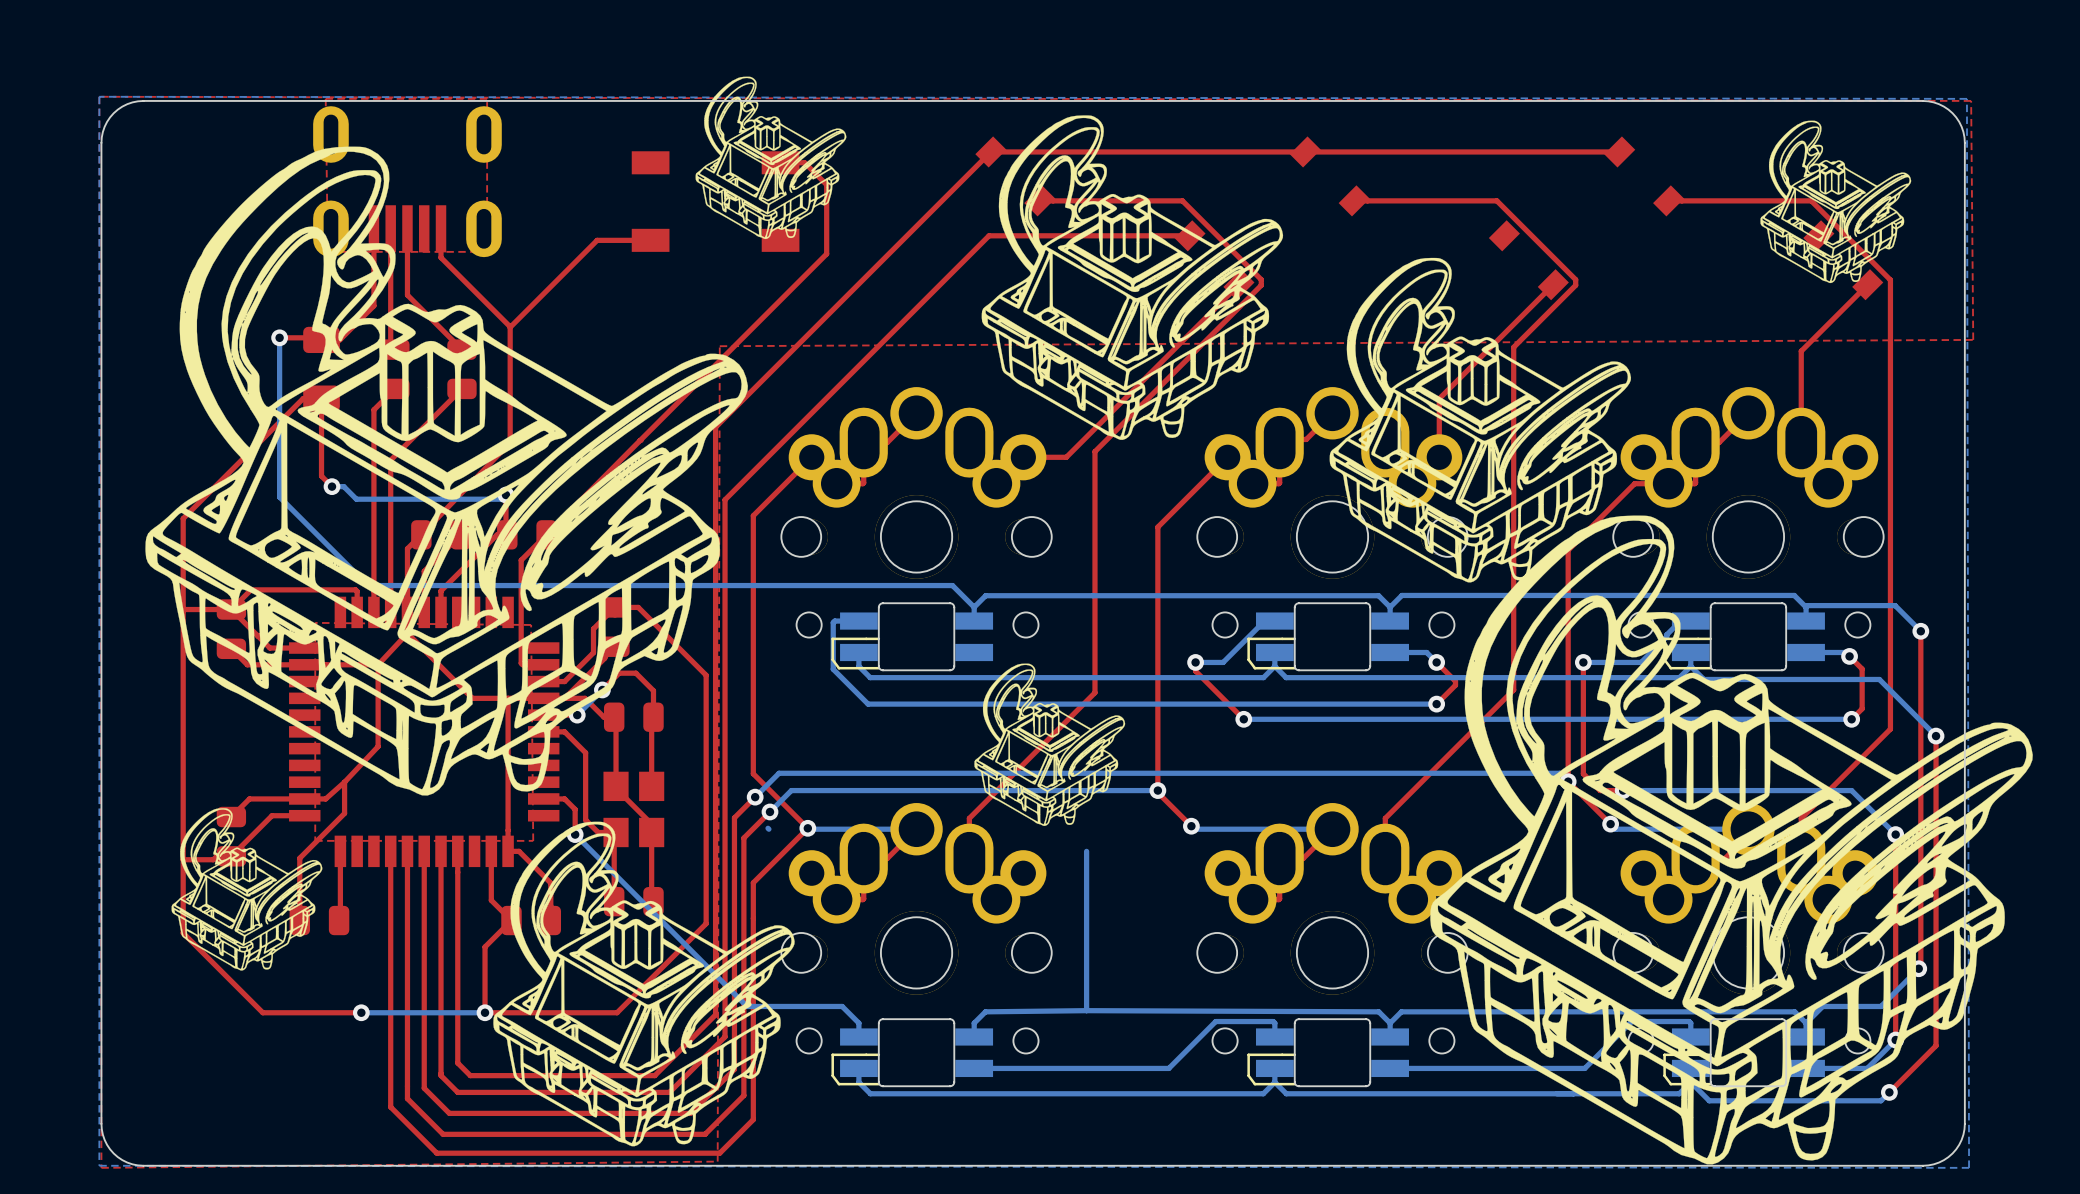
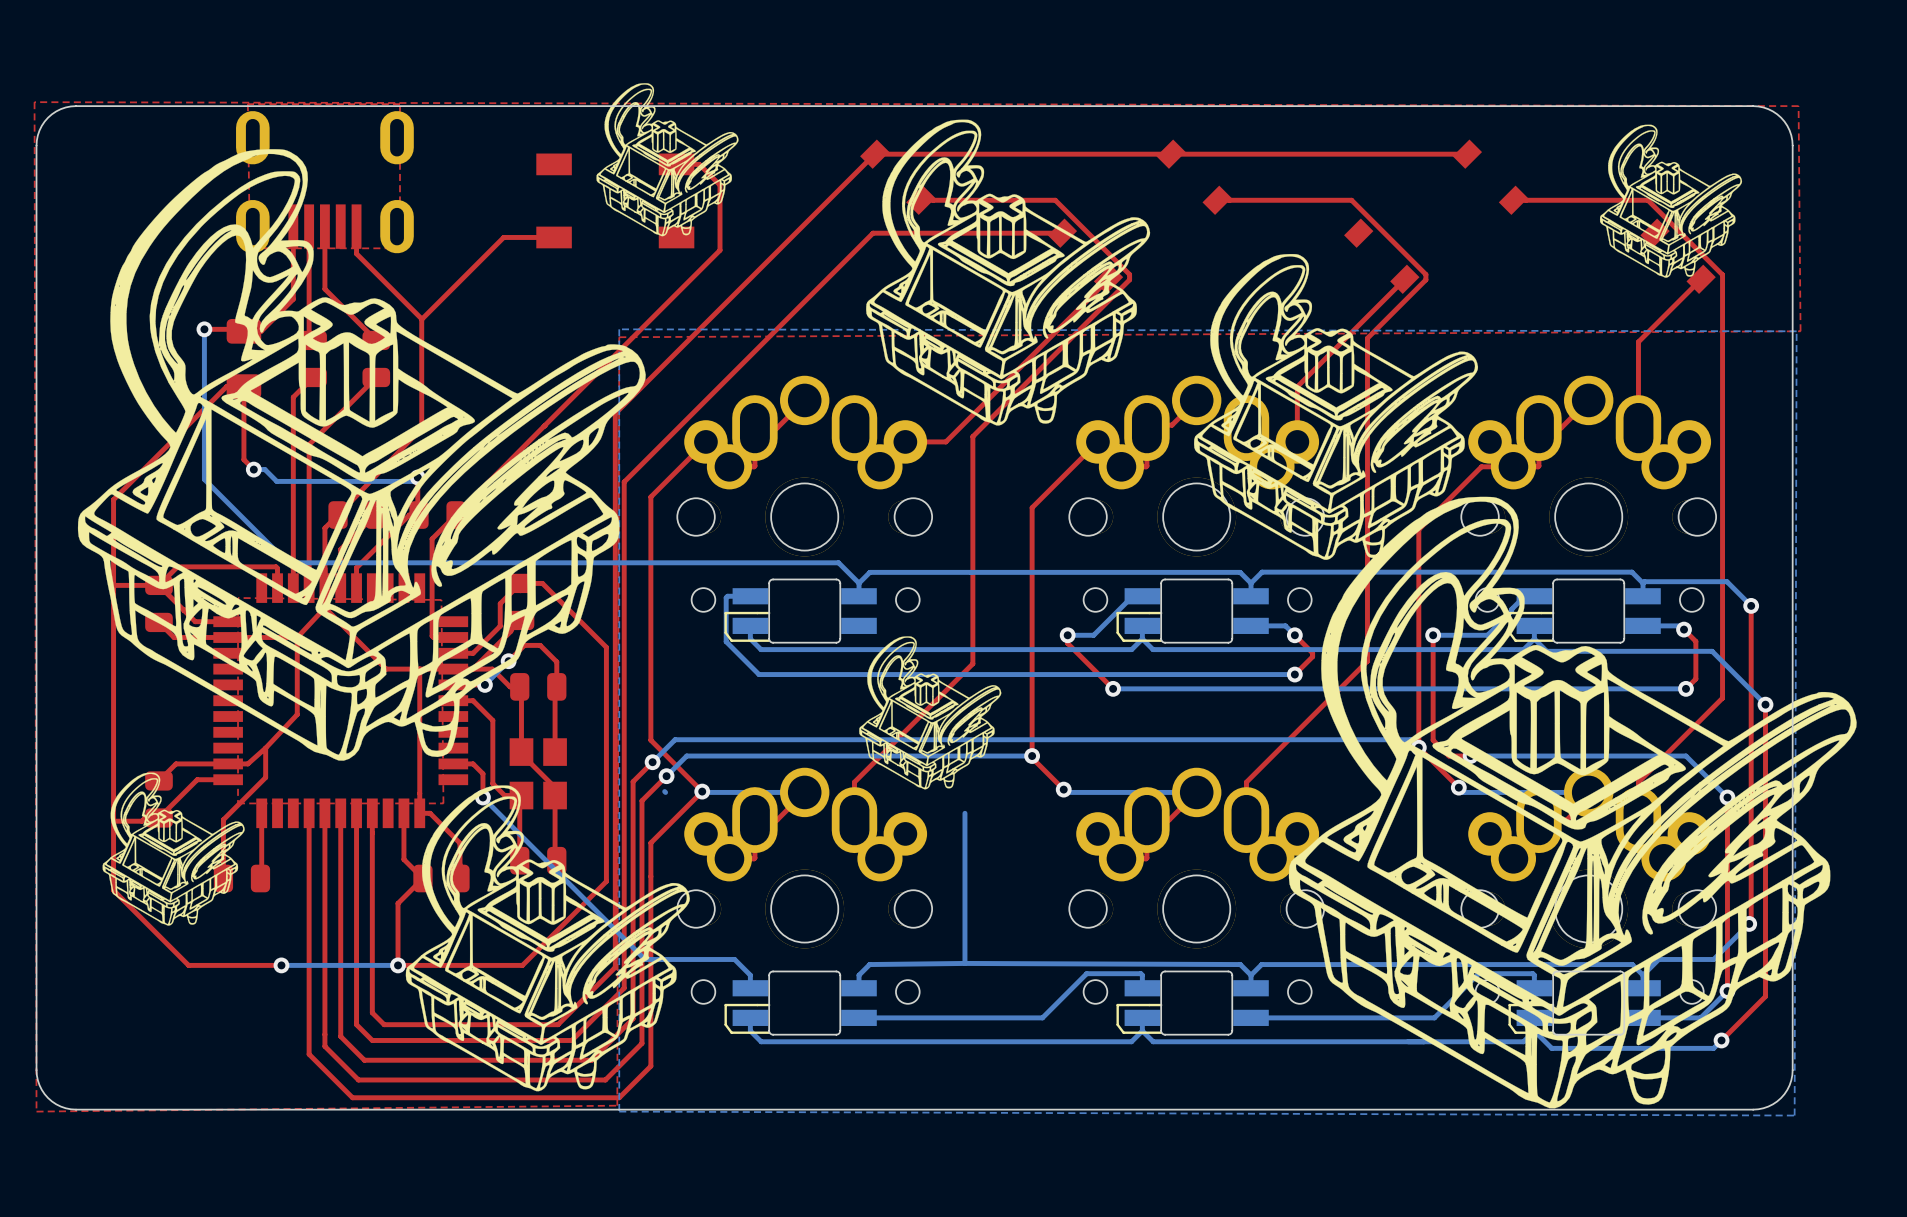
bottom zone outline: (99, 96) (1966, 98) (1969, 1167) (99, 1165) (99, 96) -> (619, 329) (1796, 331) (1794, 1115) (619, 1111) (619, 329)

